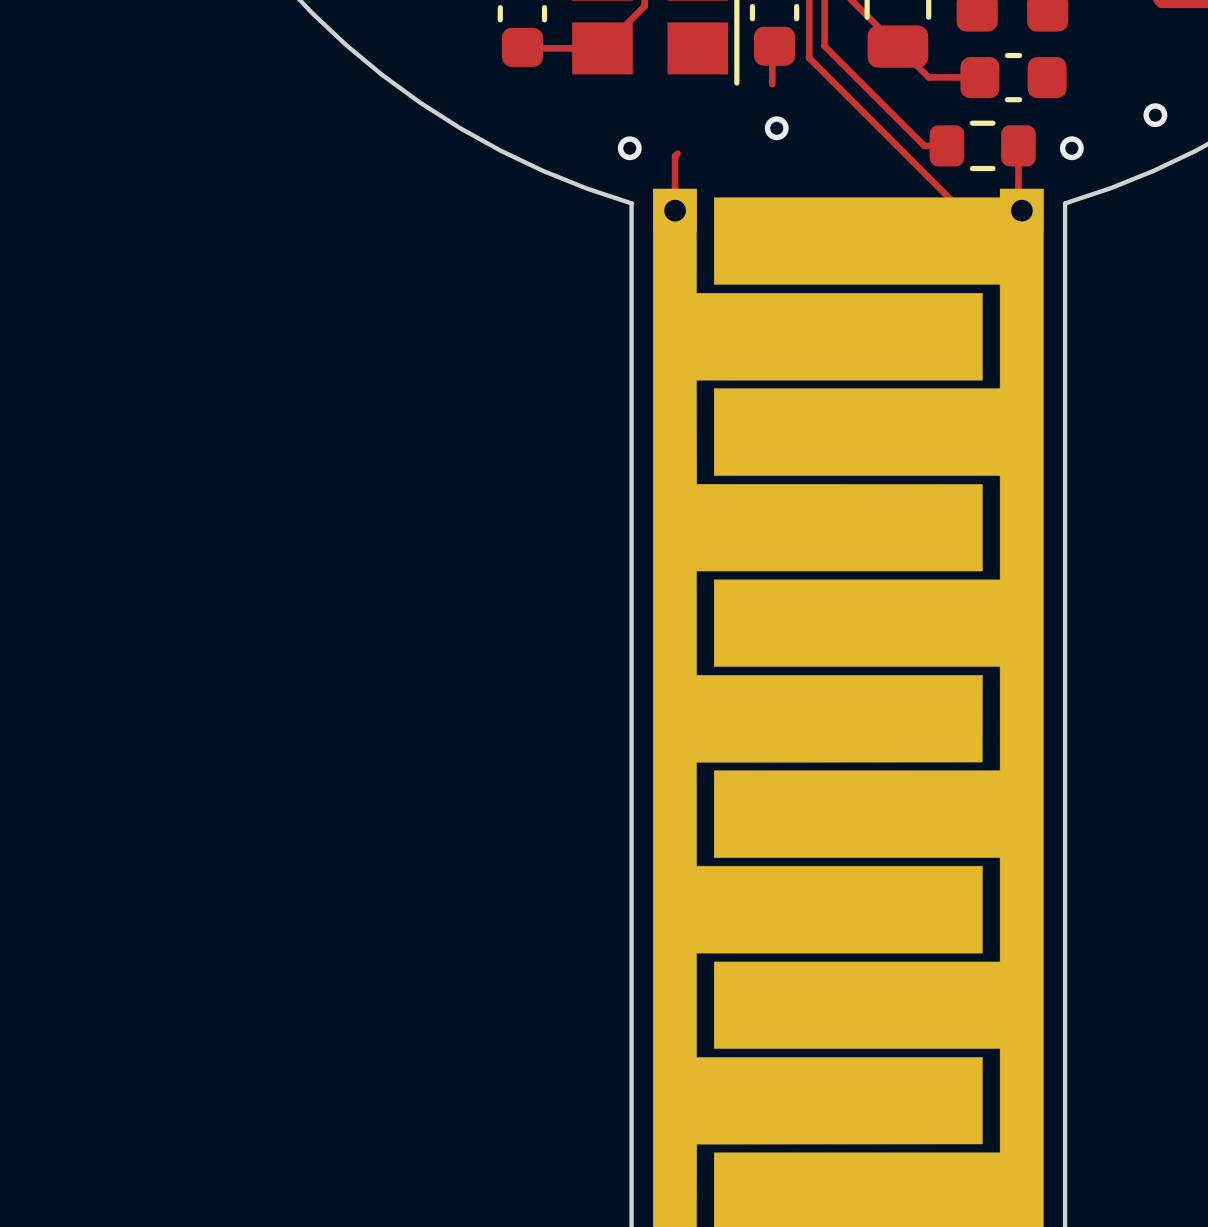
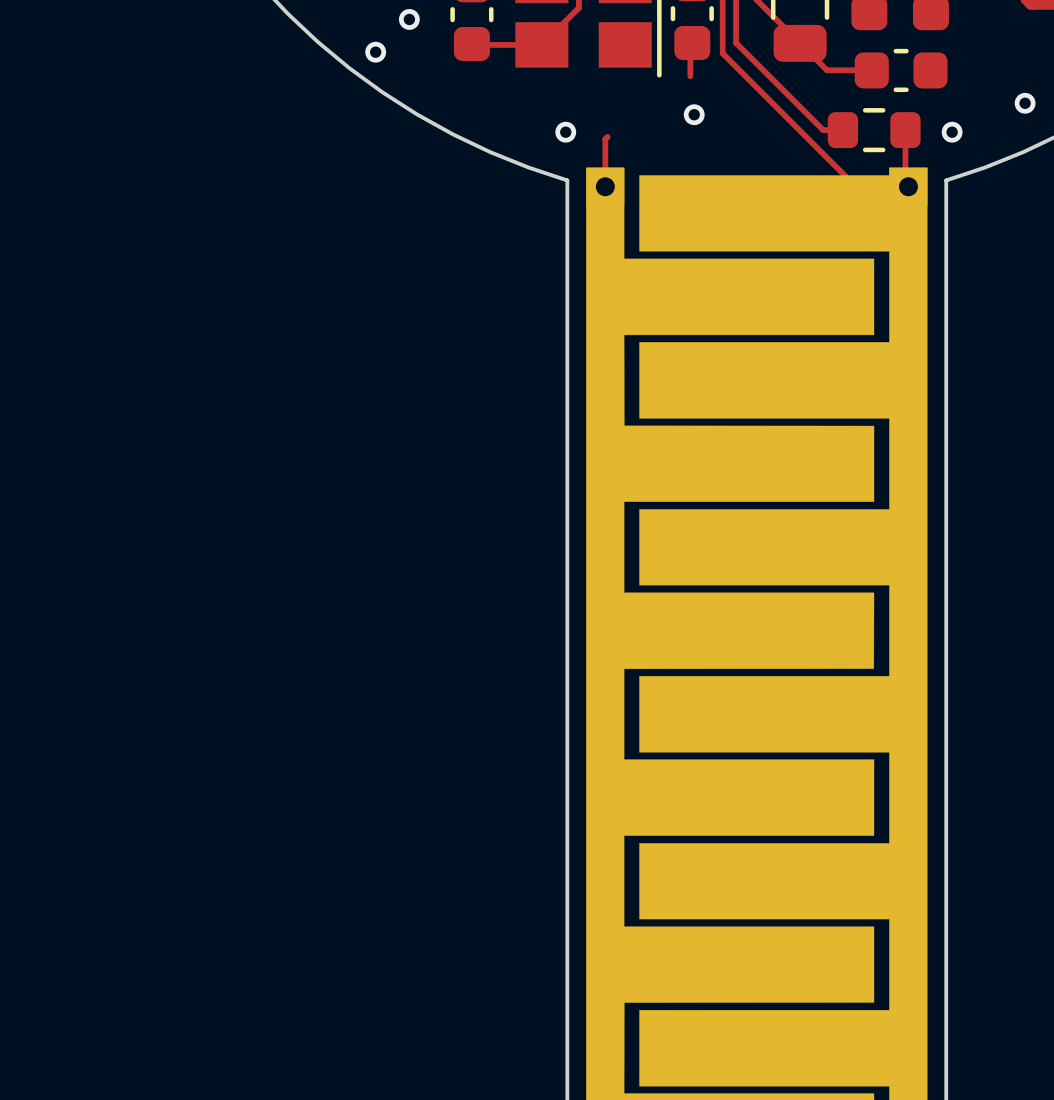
via: none -> (409, 19)
via: none -> (375, 52)

